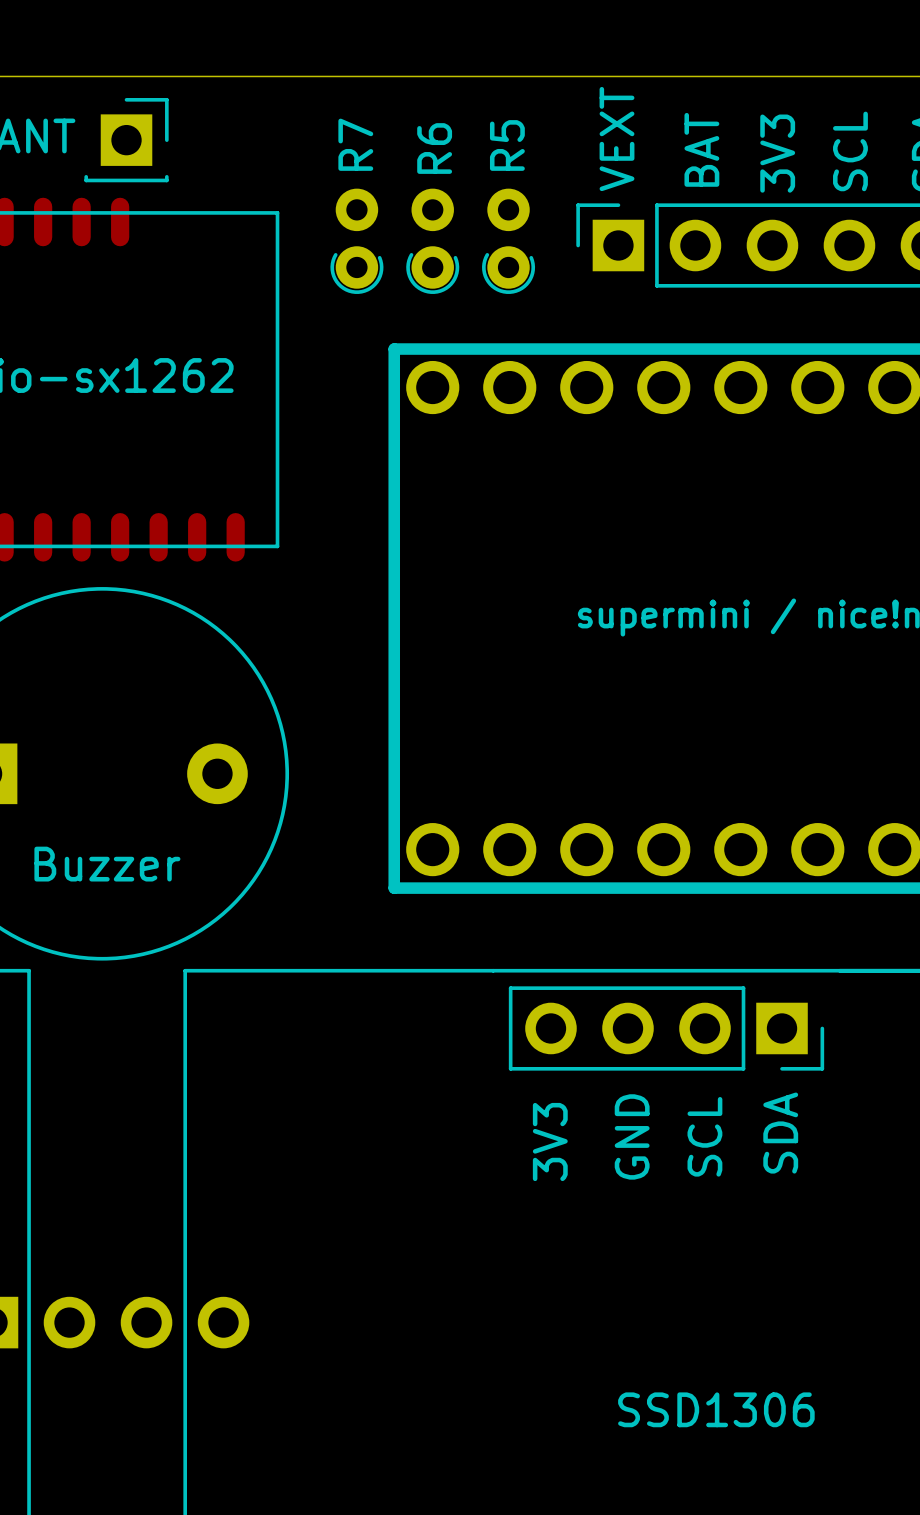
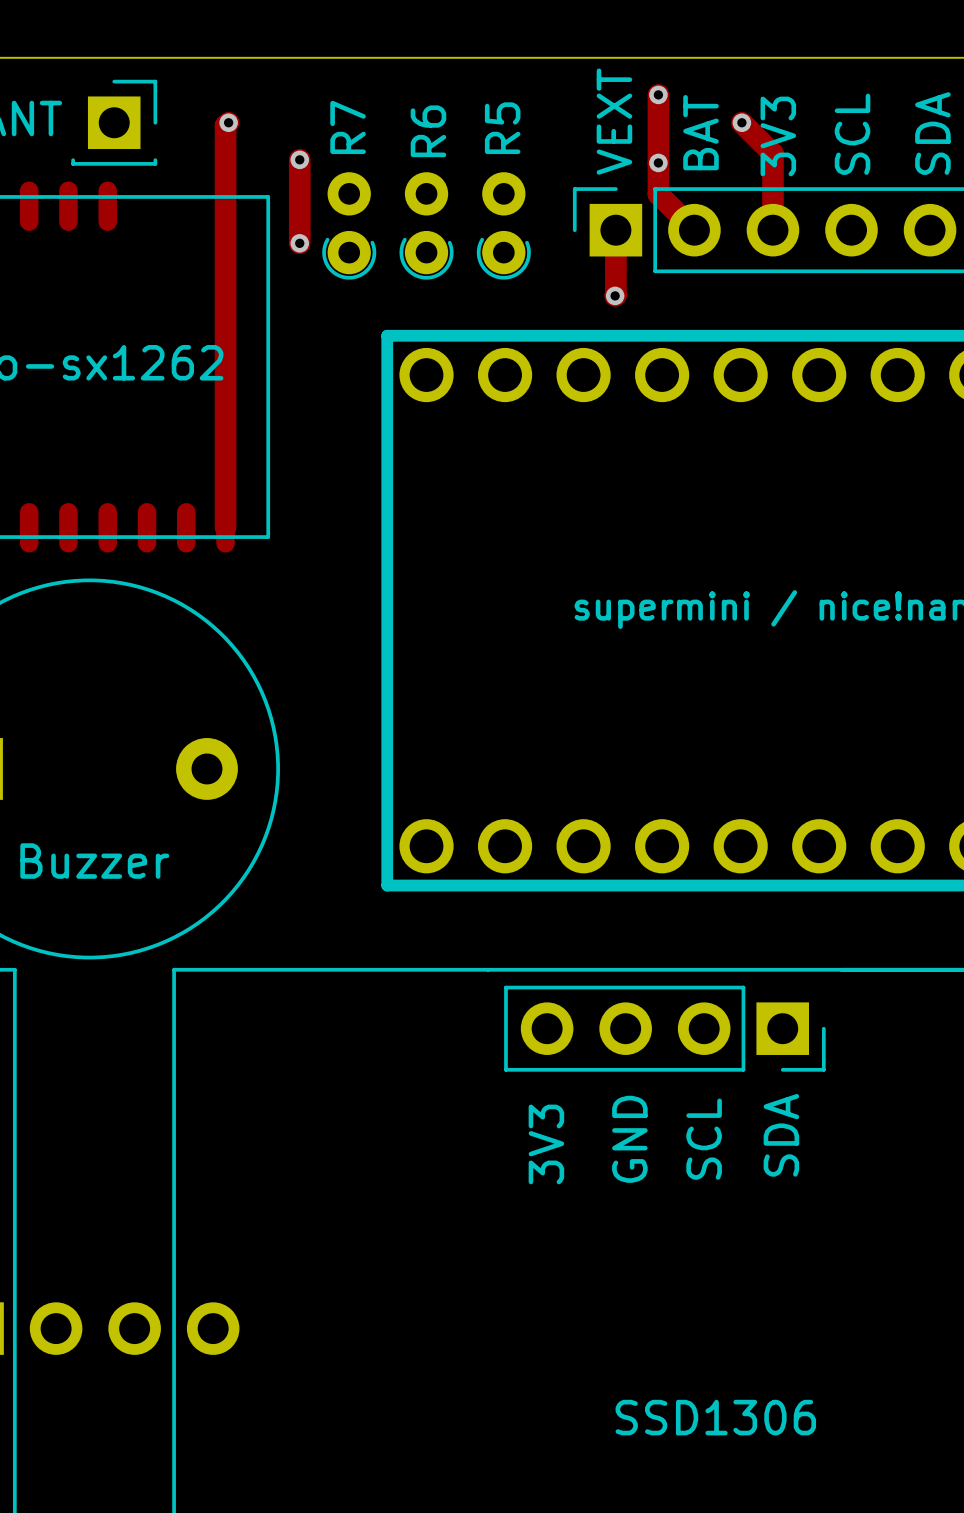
track: none -> (658, 94) (658, 194) (694, 230)
via: none -> (658, 94)
track: none -> (228, 122) (225, 125) (225, 527)
via: none -> (228, 122)
track: none -> (741, 122) (772, 153) (772, 230)
via: none -> (741, 122)
track: none -> (299, 159) (299, 243)
via: none -> (299, 159)
via: none -> (658, 162)
track: none -> (615, 230) (615, 295)
via: none -> (299, 243)
via: none -> (615, 295)

